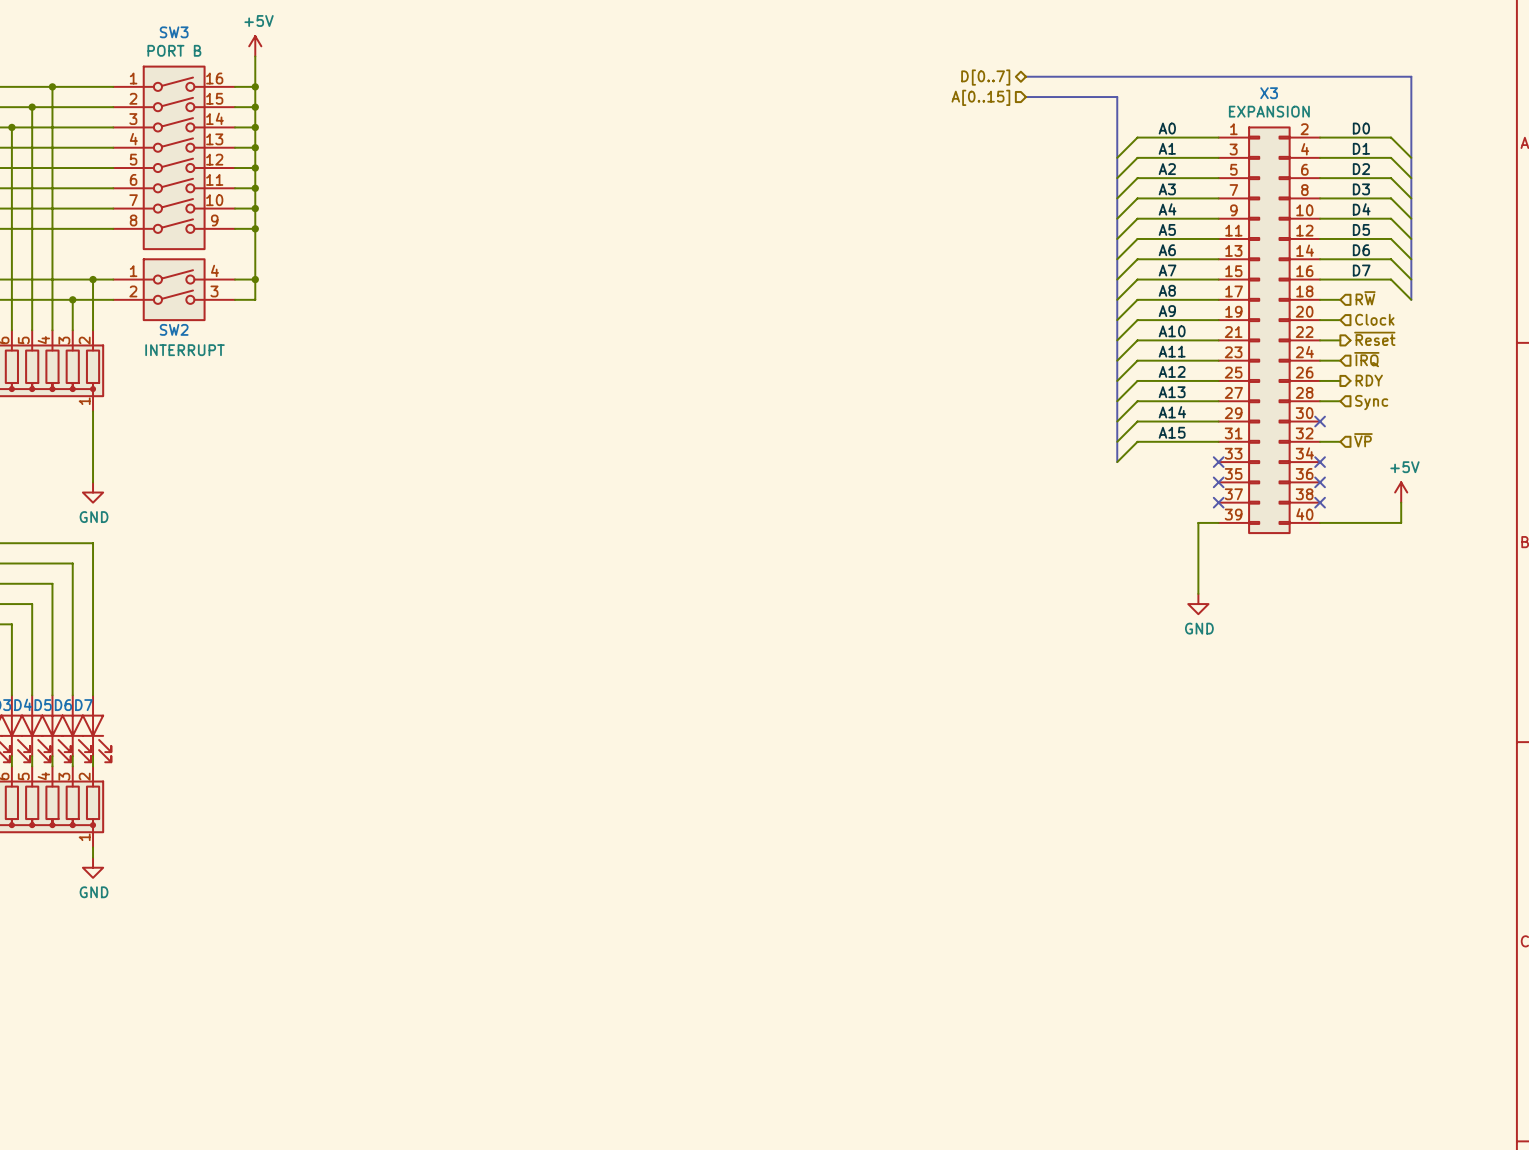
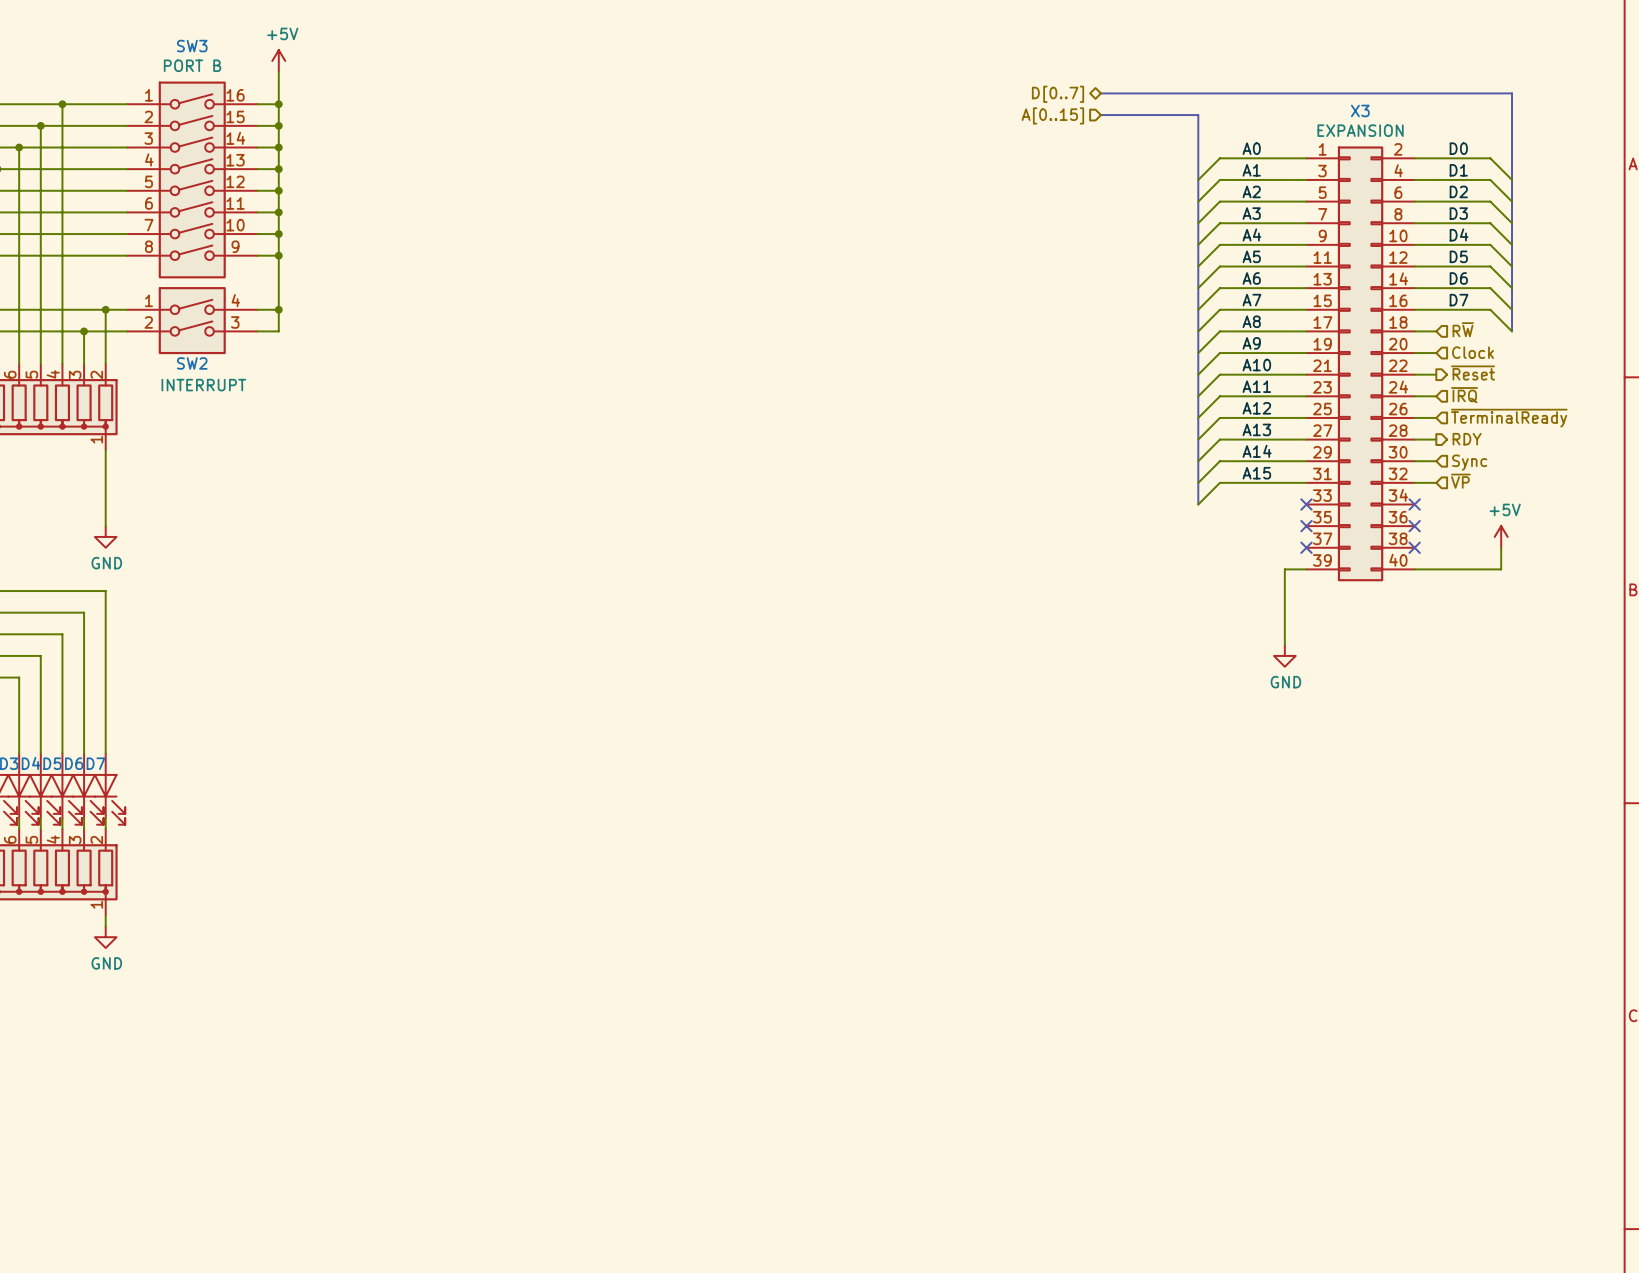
hierarchical label shape: output (1369, 380) -> input (1509, 418)
hierarchical label: RDY (1369, 380) -> ~{TerminalReady} (1509, 418)
hierarchical label shape: input (1371, 402) -> output (1467, 439)
hierarchical label: Sync (1371, 402) -> RDY (1467, 439)
wire: none -> (1414, 461) (1436, 461)
no-connect mark: (1320, 421) -> none
hierarchical label: none -> Sync (1469, 462)

